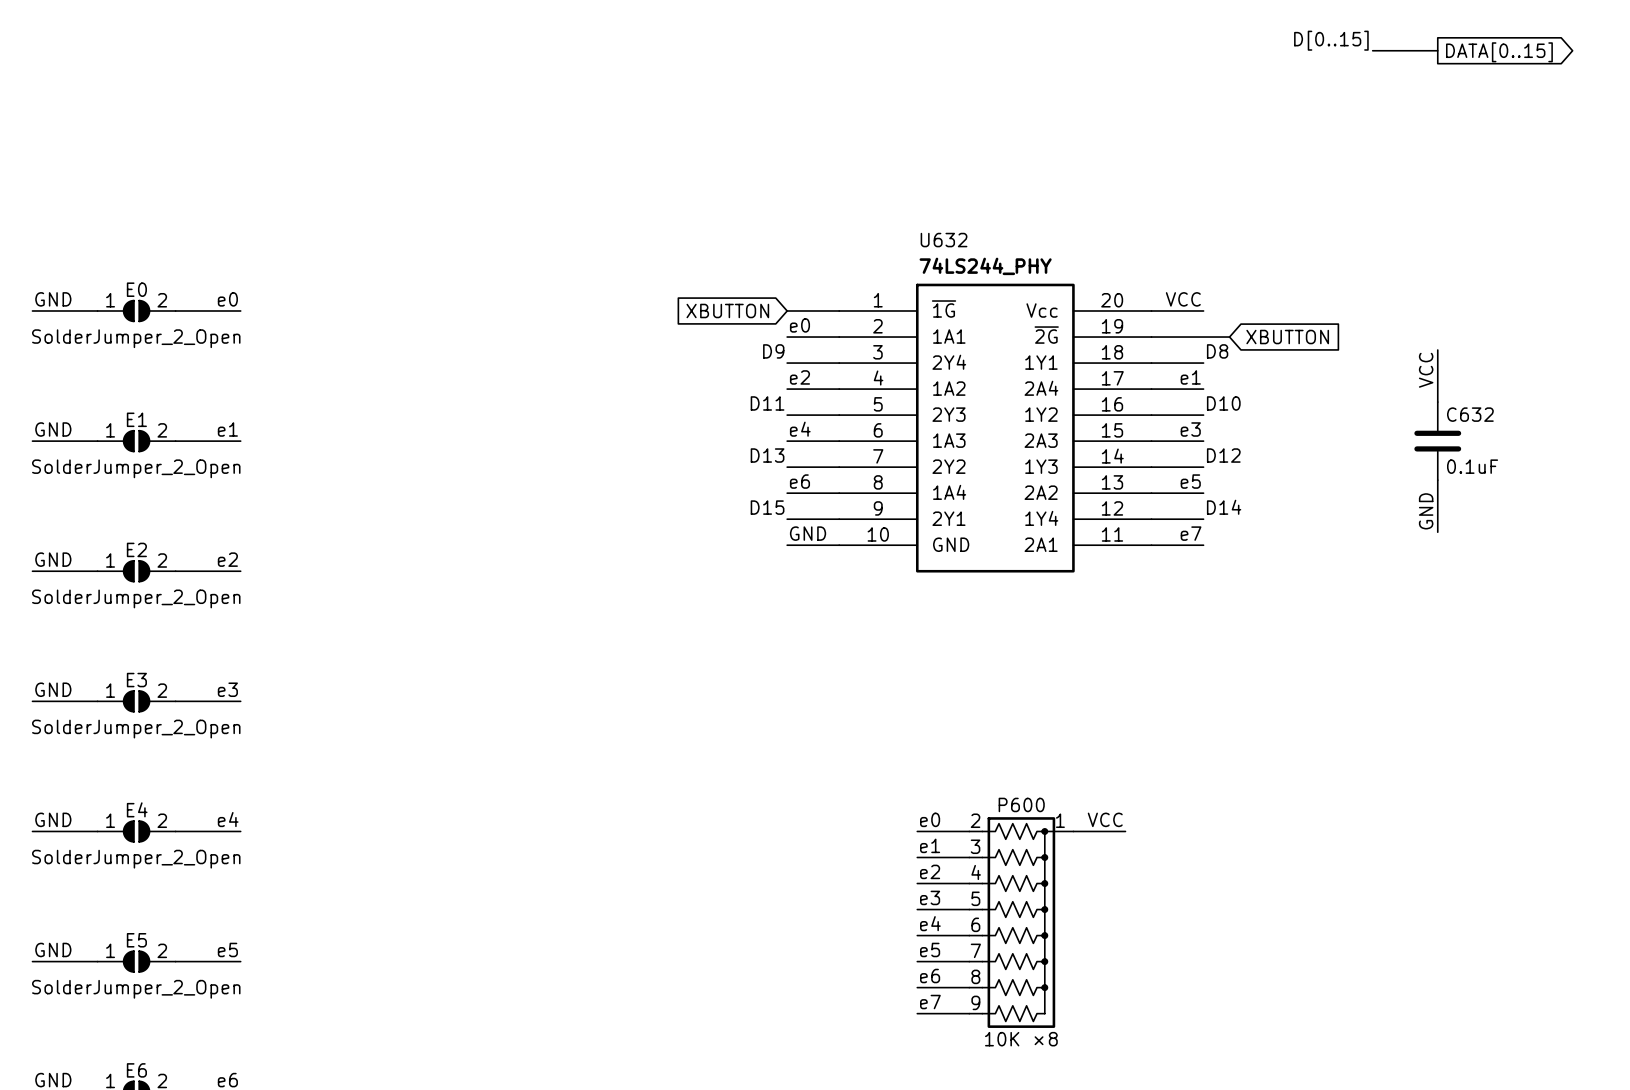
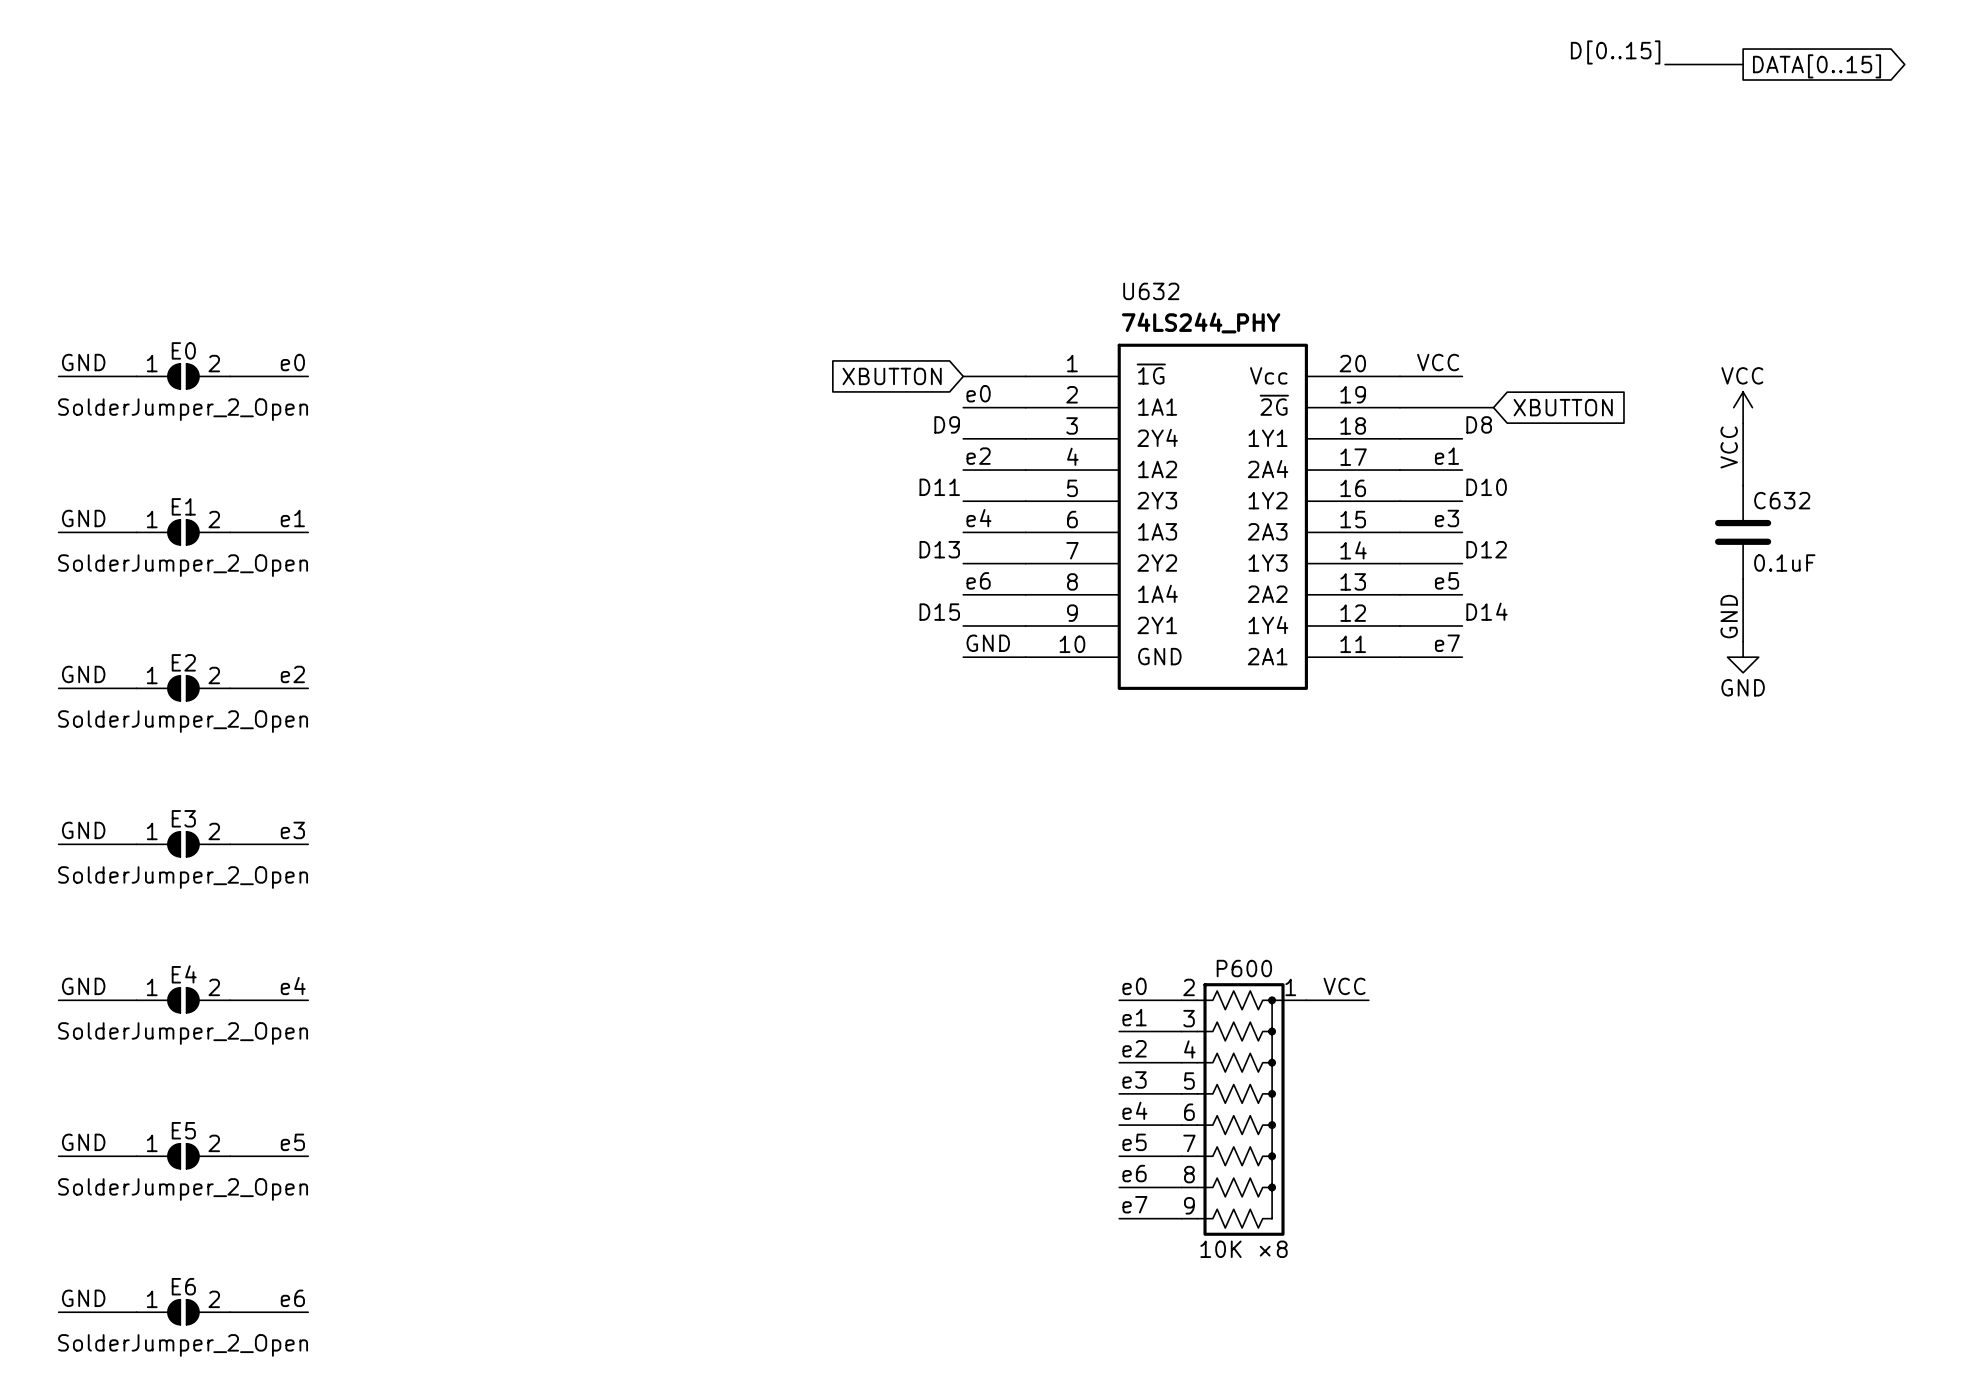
power symbol: none -> VCC (1743, 407)
power symbol: none -> GND (1743, 657)

